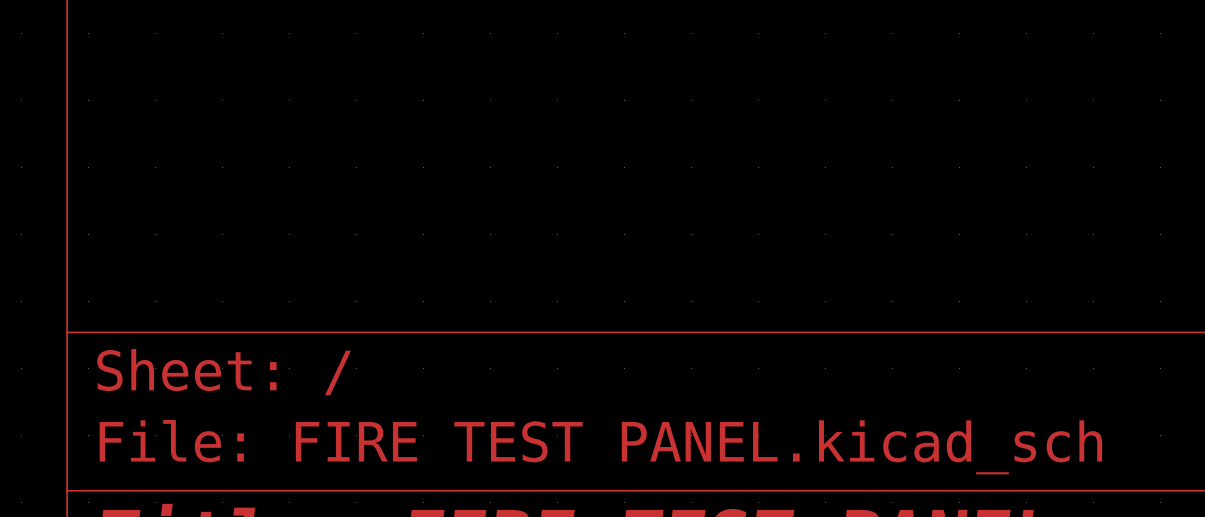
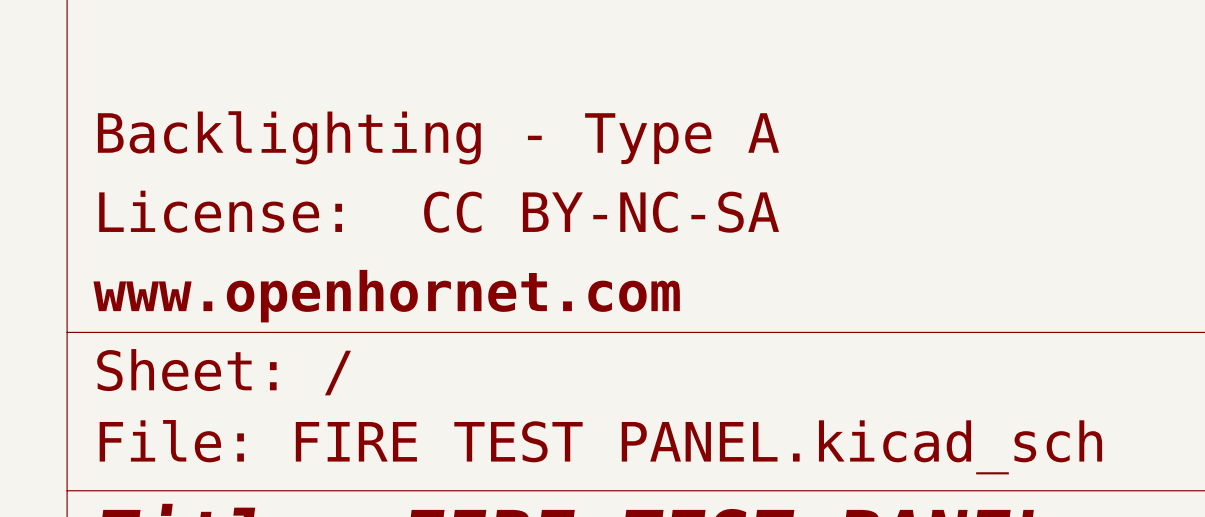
title block: none -> Backlighting - Type A (438, 137)
title block: none -> License: CC BY-NC-SA (439, 211)
title block: none -> www.openhornet.com (386, 296)

